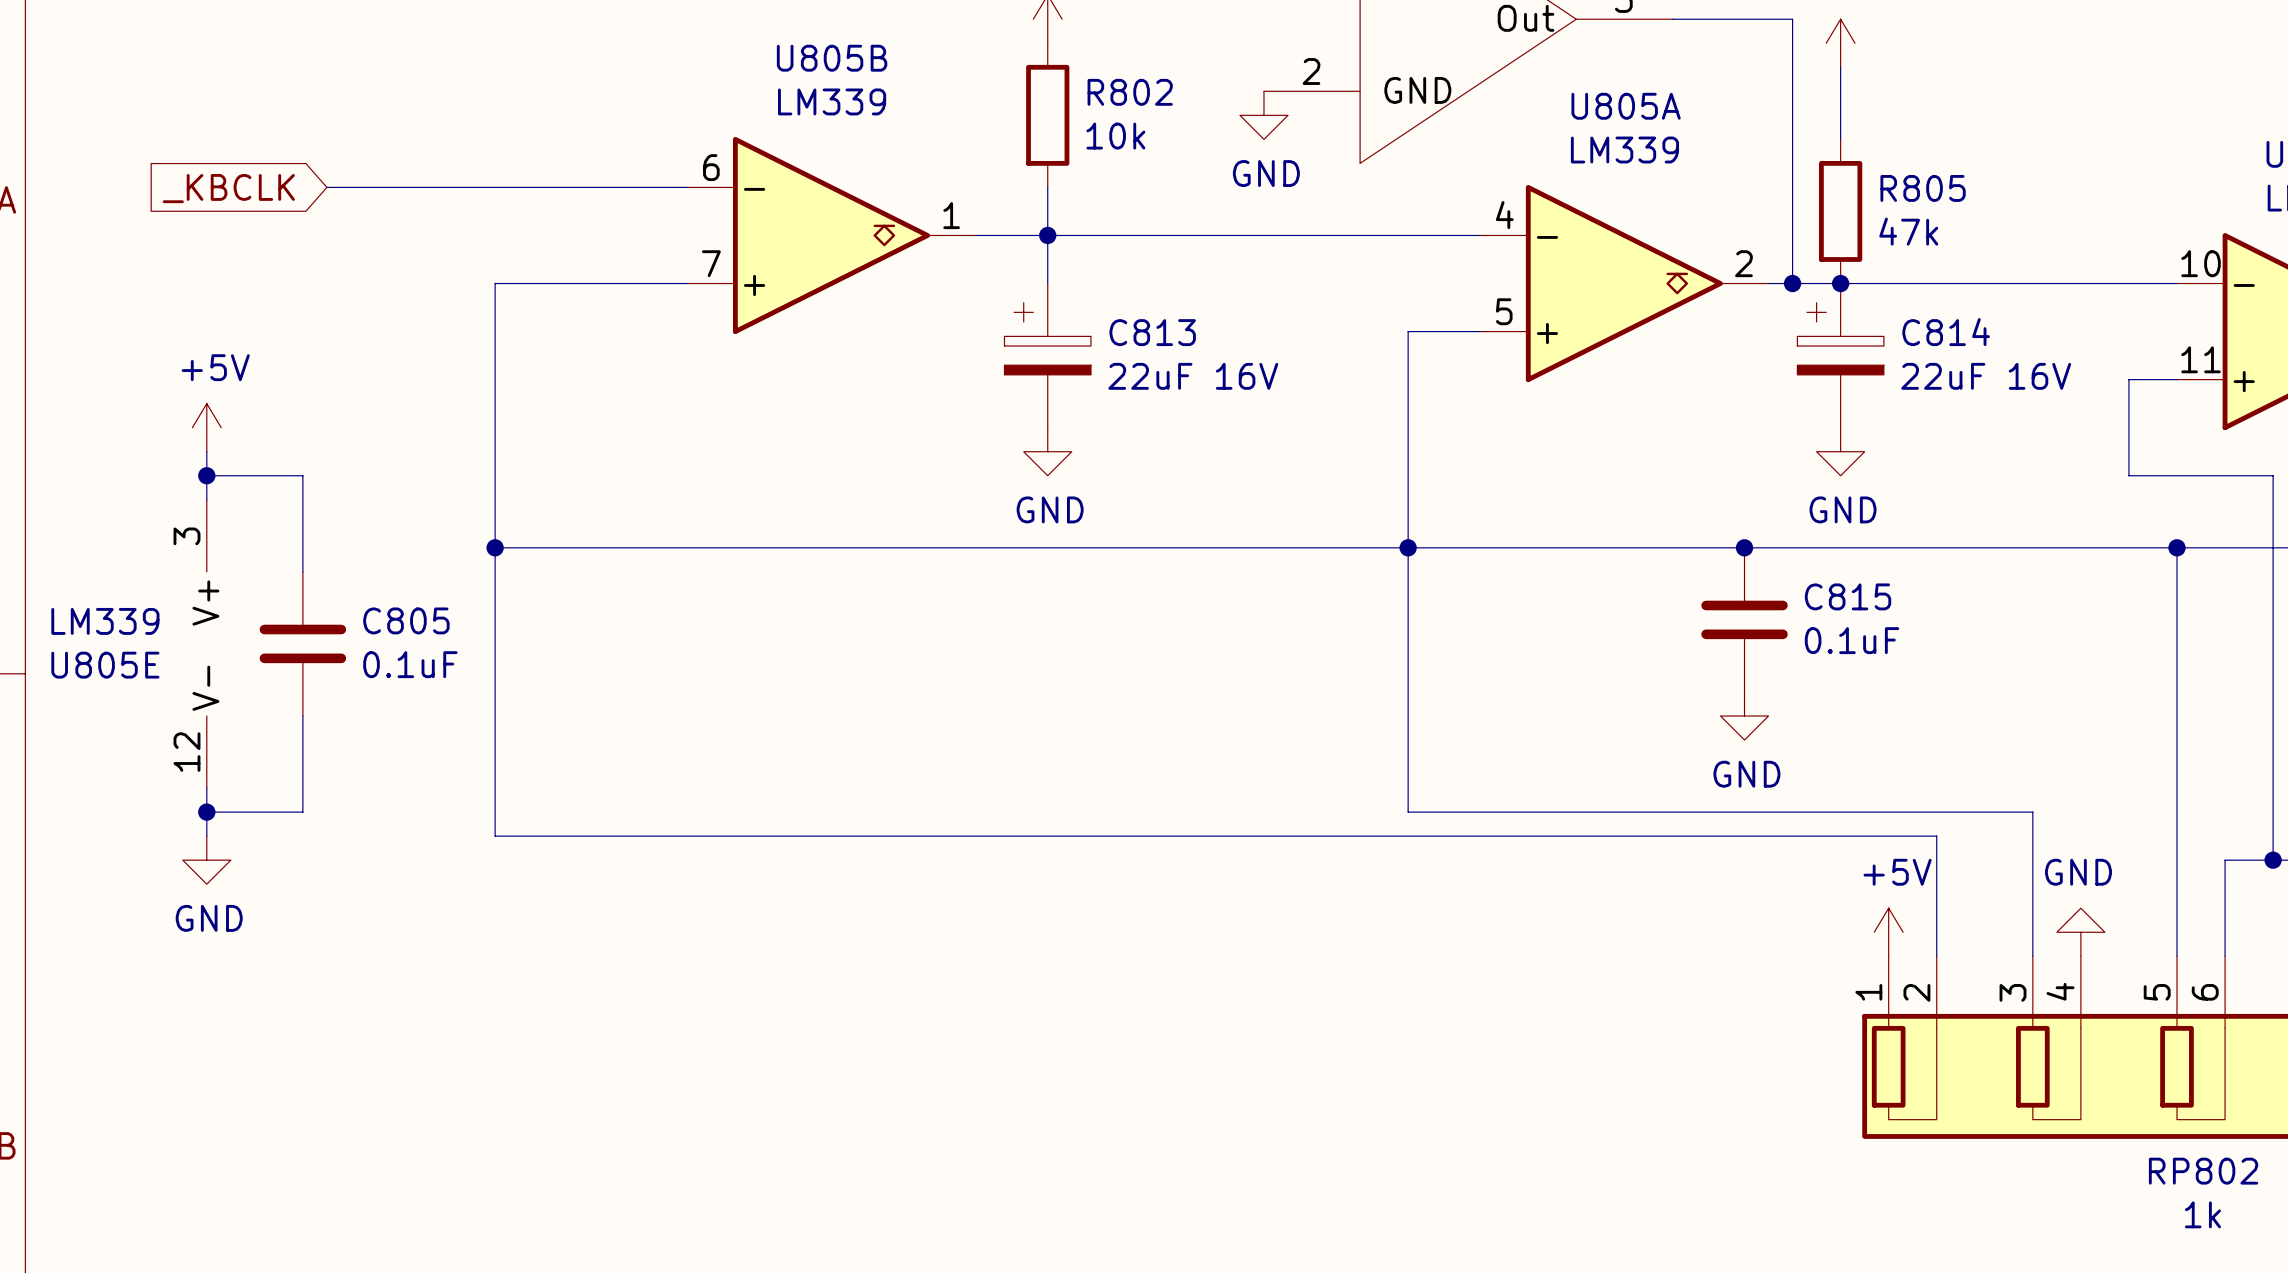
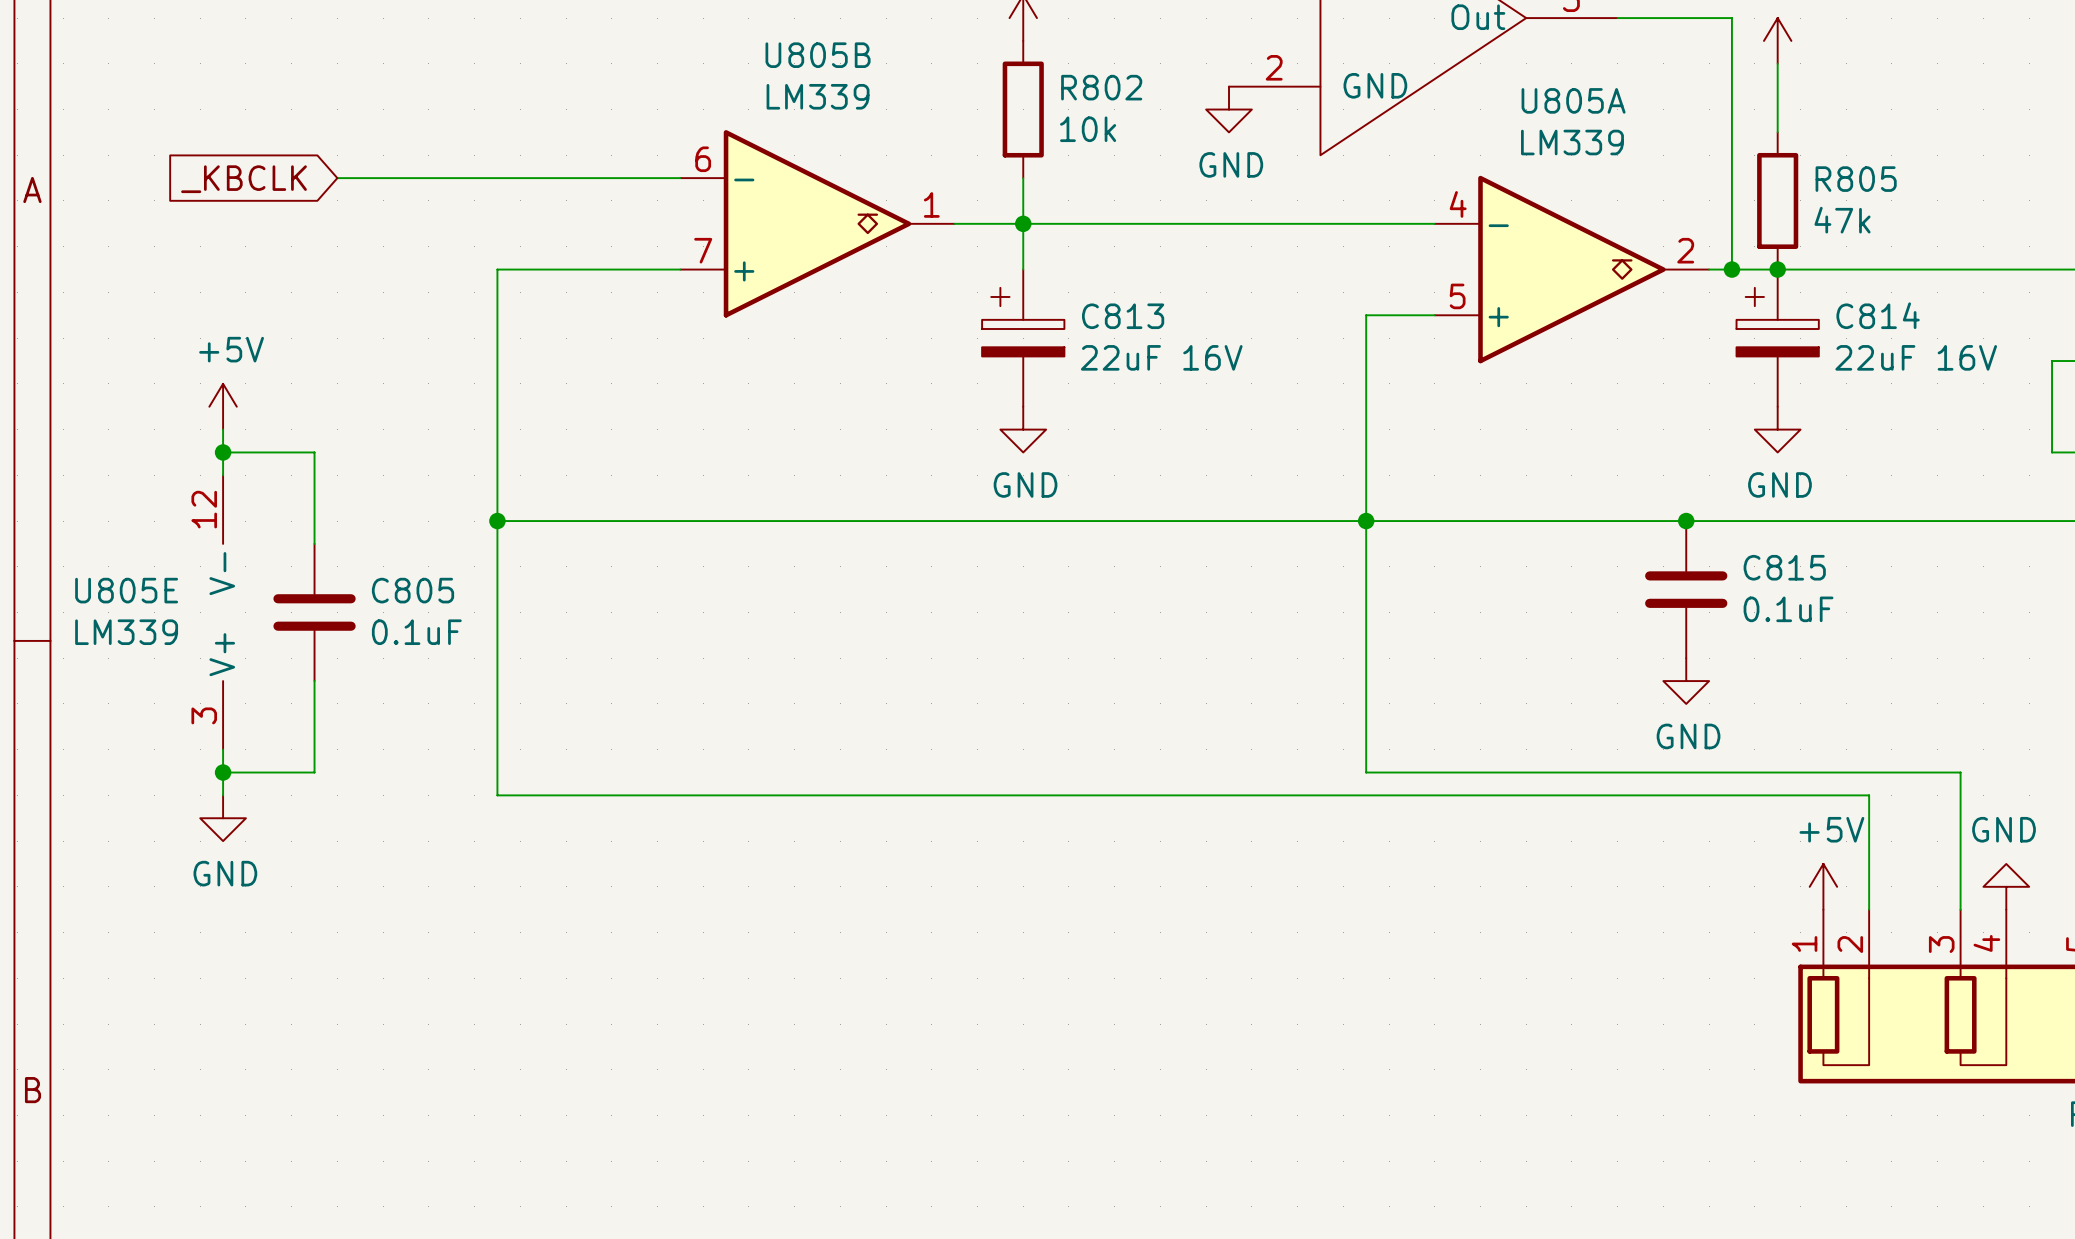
U805E value position: LM339 (105, 621) -> LM339 (126, 632)
U805E rotation: 0° (206, 643) -> 180° (223, 612)
U805E name position: U805E (105, 665) -> U805E (126, 590)

